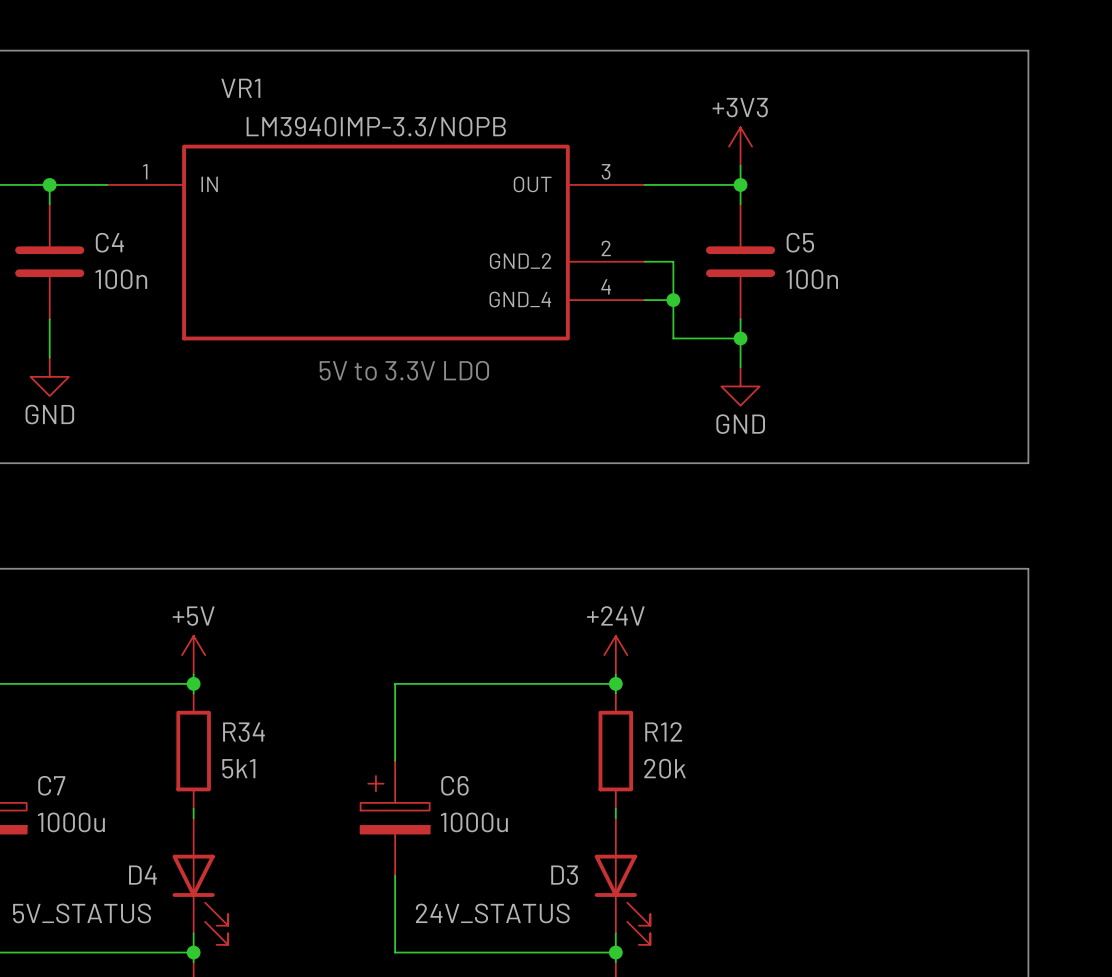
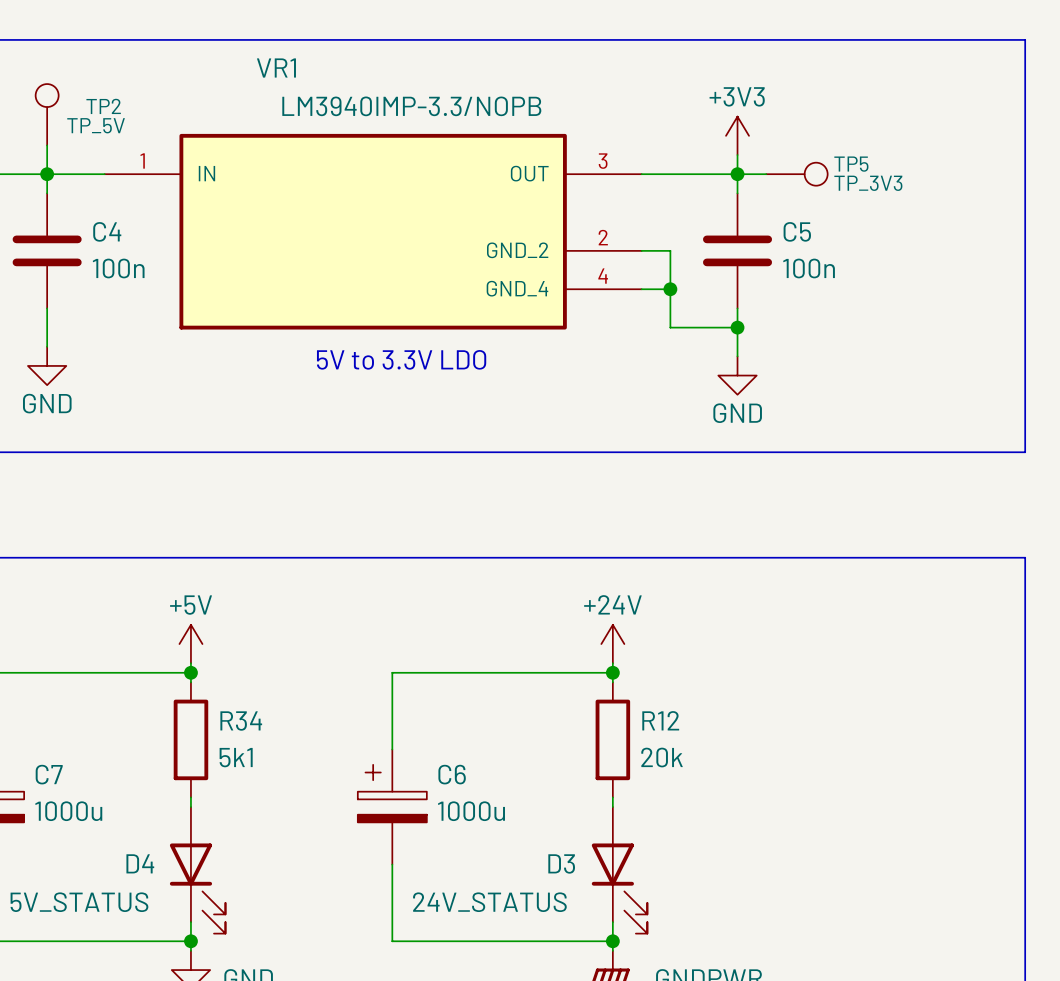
VR1 name position: VR1 (240, 88) -> VR1 (276, 67)
TP2: none -> TP_5V (47, 114)
VR1 value position: LM3940IMP-3.3/NOPB (376, 126) -> LM3940IMP-3.3/NOPB (411, 106)
wire: none -> (47, 145) (47, 174)
wire: none -> (737, 174) (766, 174)
TP5: none -> TP_3V3 (796, 174)

